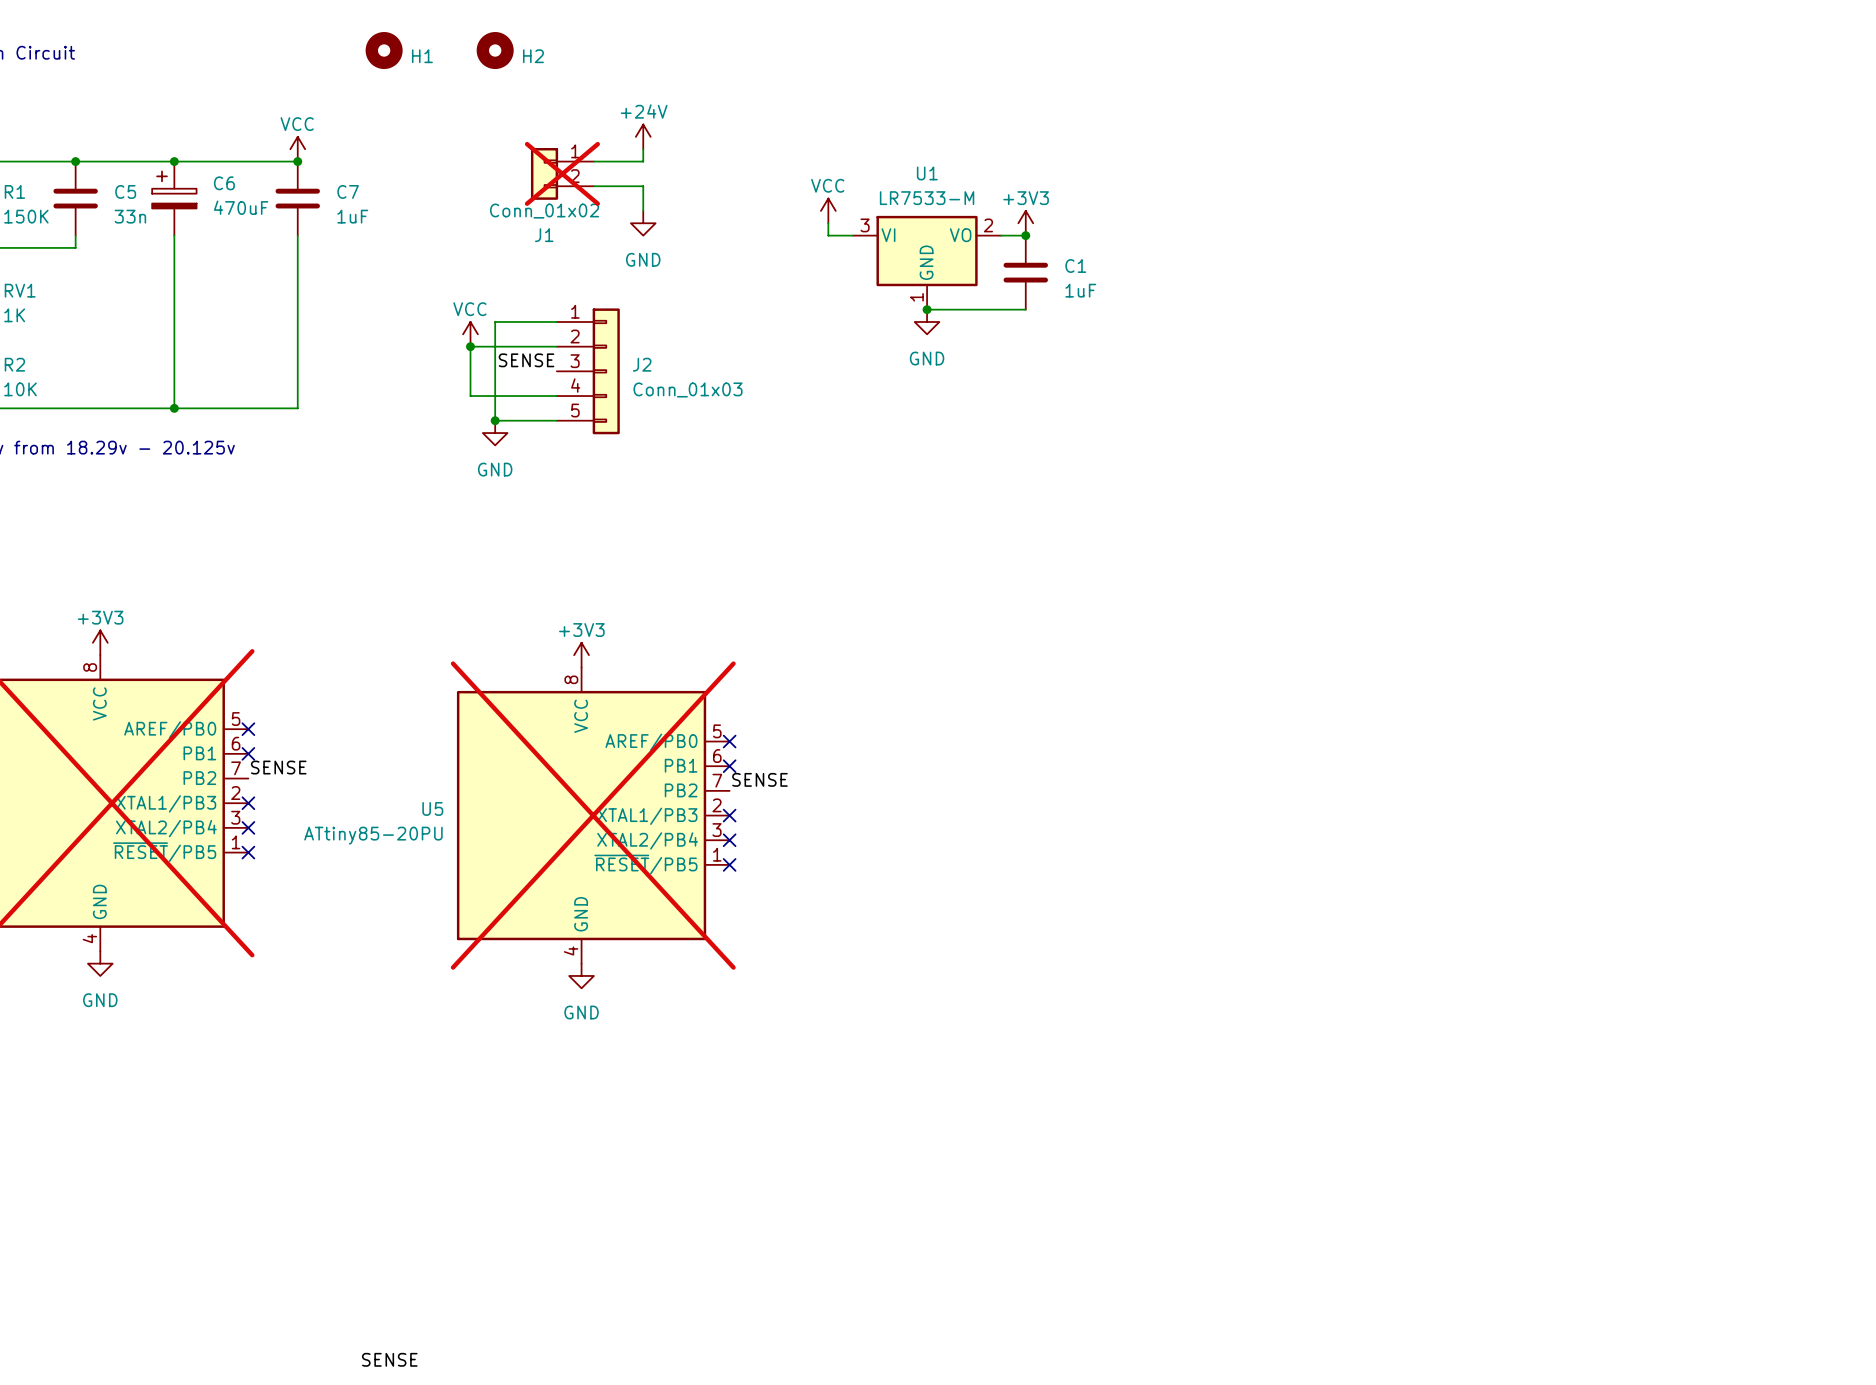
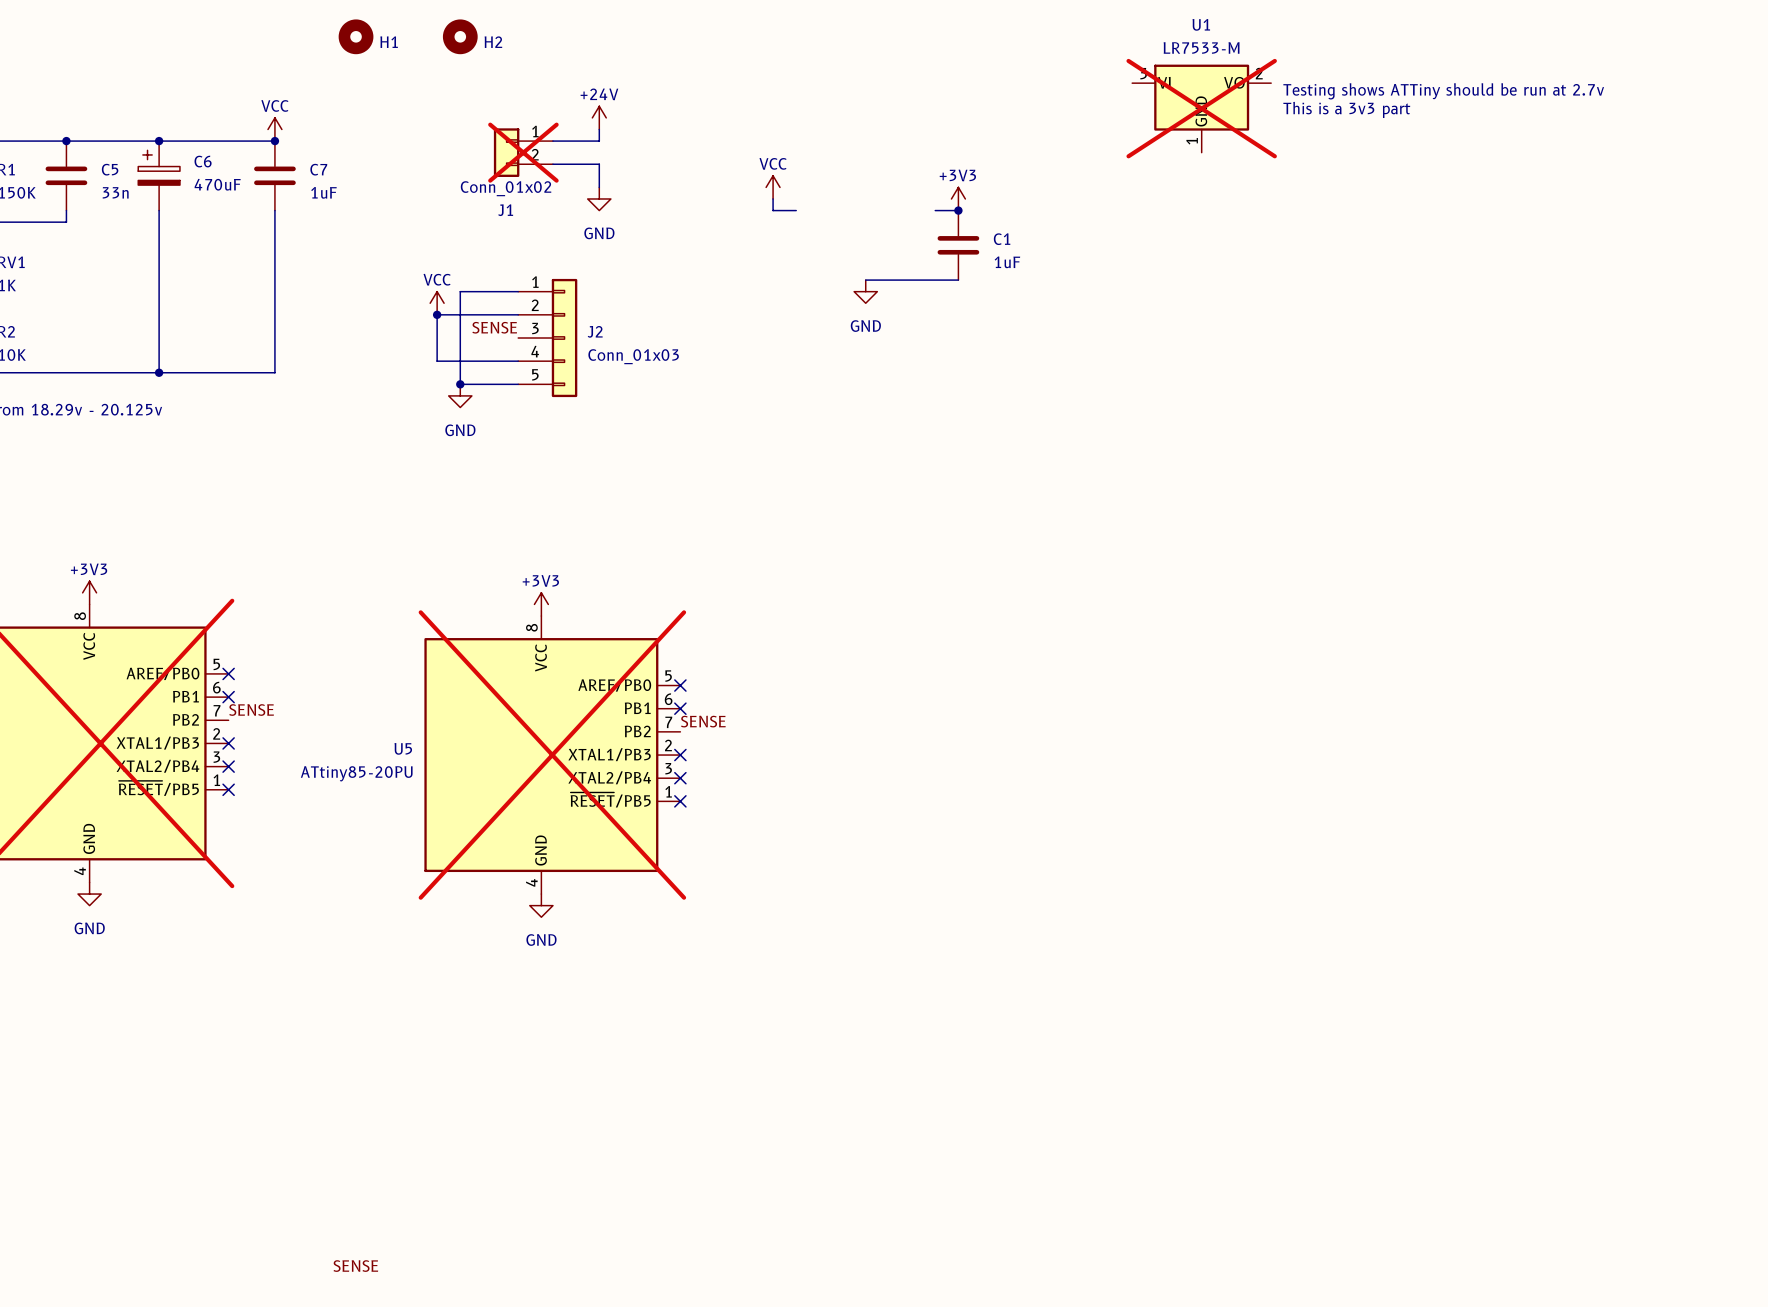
text: none -> Testing shows ATTiny should be run at 2.7v (1443, 91)
U1 do-not-place cross: none -> (1201, 108)
text: none -> This is a 3v3 part (1346, 109)
U1 position: (927, 262) -> (1201, 108)
junction: (927, 309) -> none

